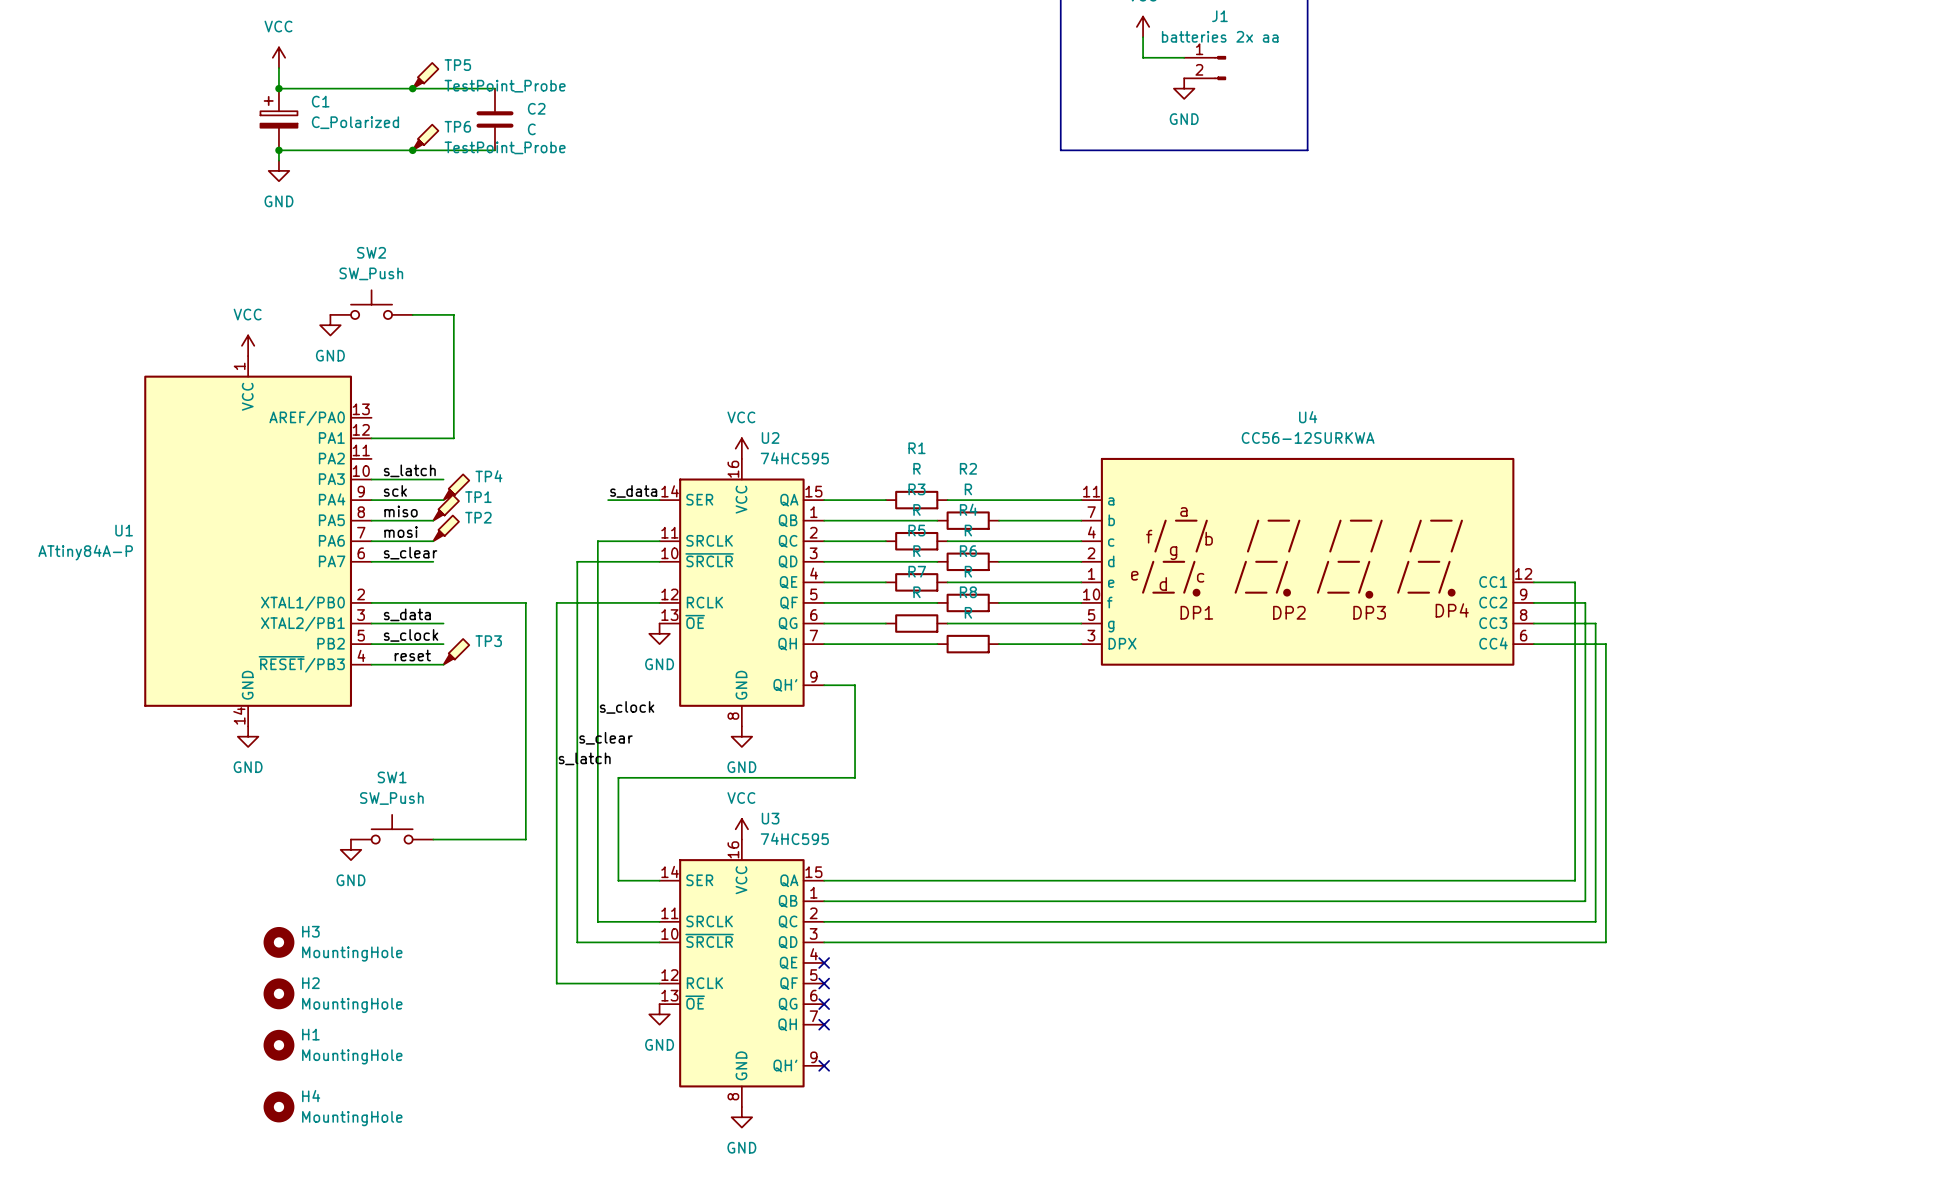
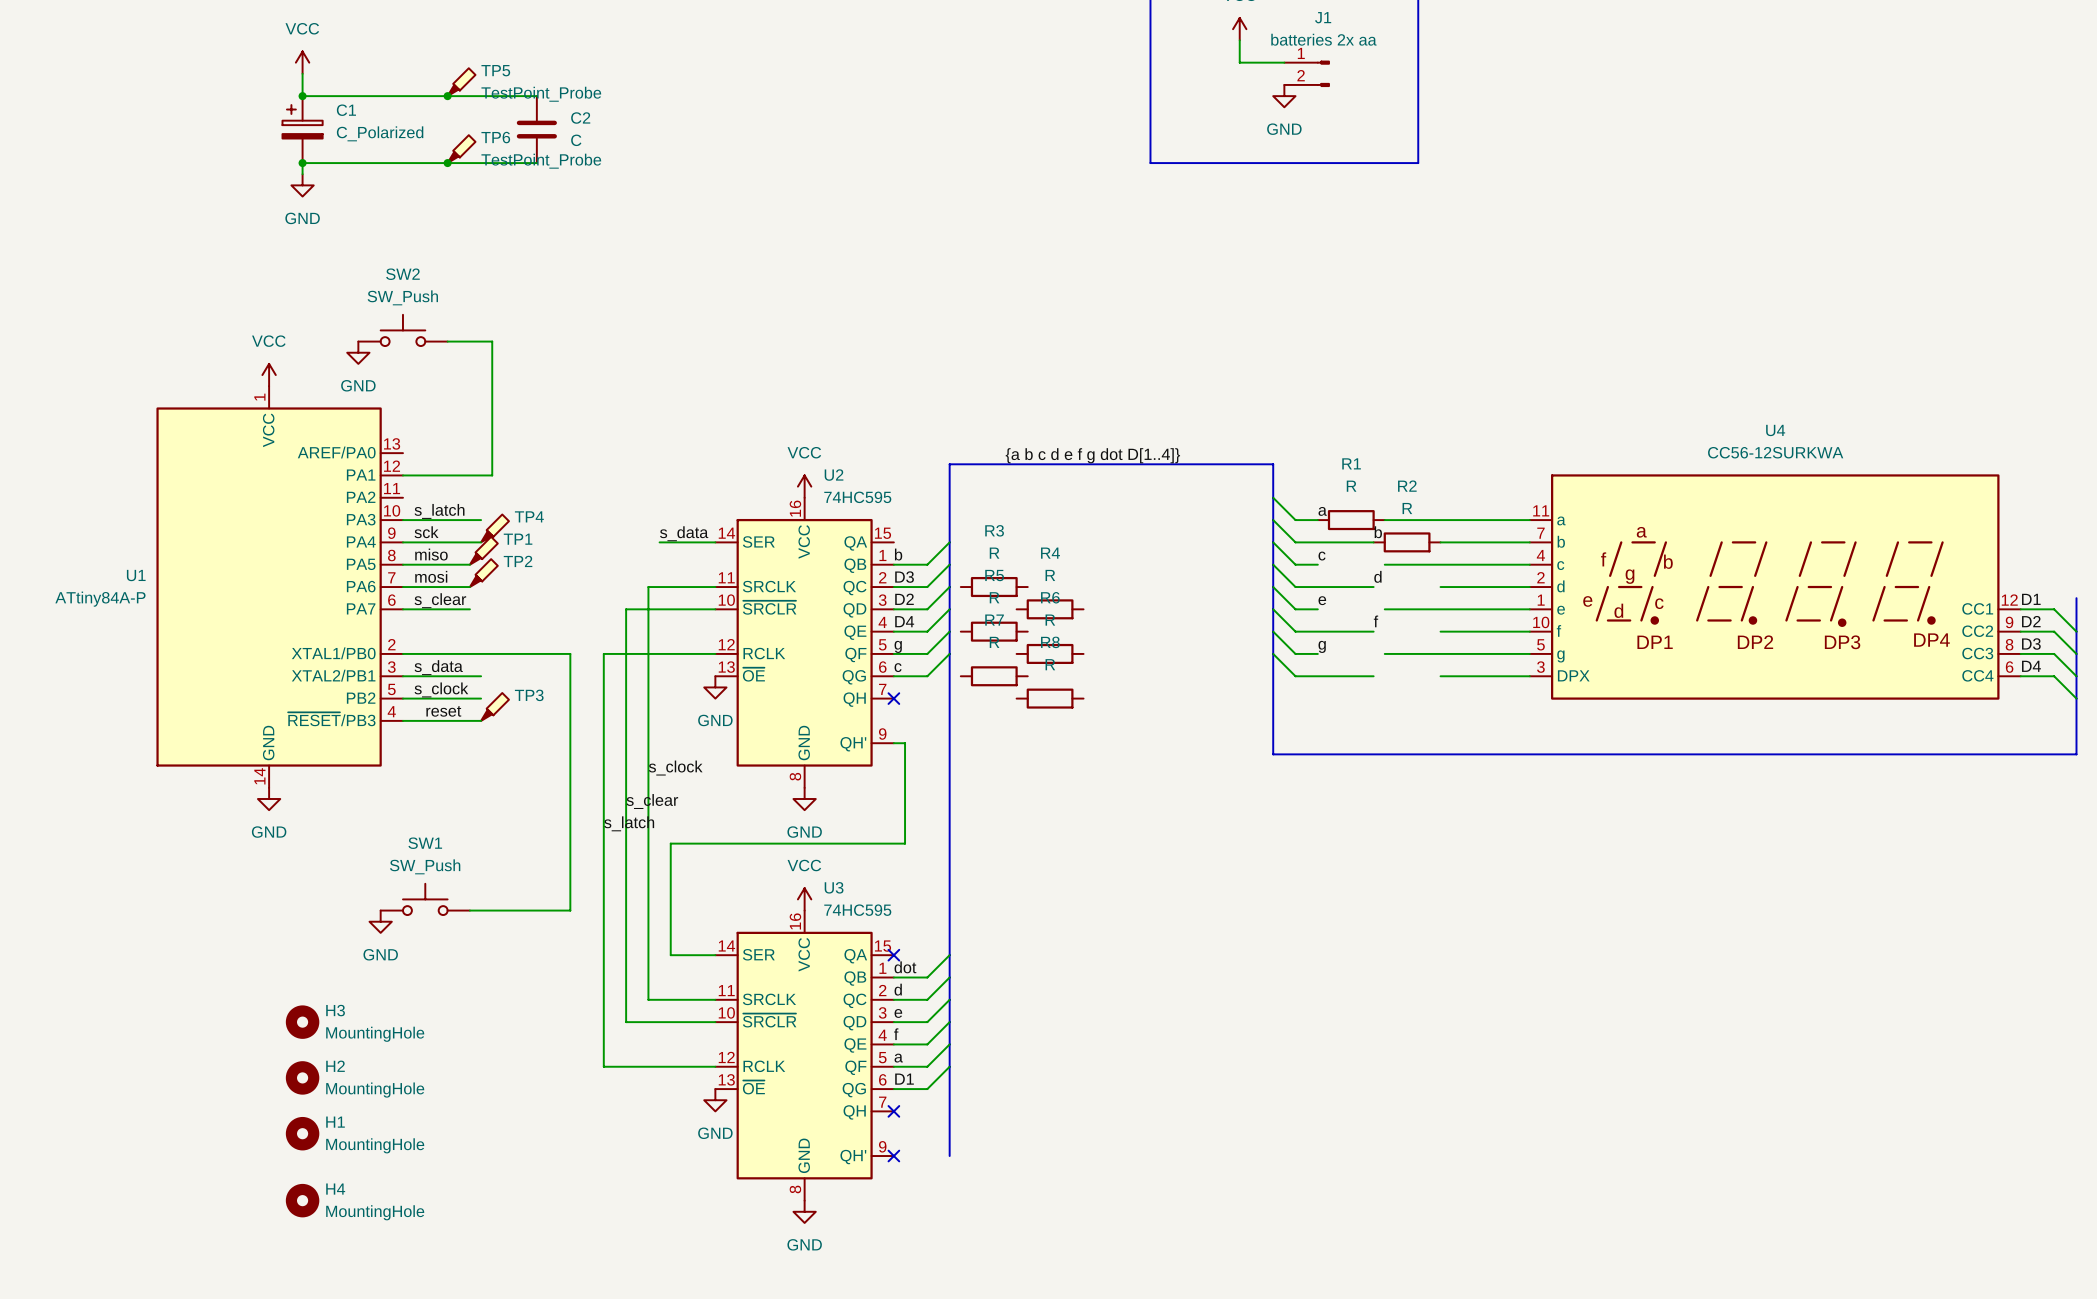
label: none -> {a b c d e f g dot D[1..4]} (1092, 455)
label: none -> a (1322, 511)
label: none -> b (1378, 532)
wire: (824, 500) (885, 500) -> none
R1 position: (916, 500) -> (1351, 520)
wire: (947, 500) (1081, 500) -> none
label: none -> b (898, 554)
label: none -> c (1322, 556)
wire: (855, 520) (937, 520) -> (927, 564) (949, 542)
R2 position: (968, 520) -> (1407, 542)
wire: (999, 520) (1081, 520) -> none
label: none -> D3 (904, 577)
label: none -> d (1377, 576)
wire: (855, 541) (885, 541) -> (927, 587) (949, 564)
wire: (947, 541) (1081, 541) -> none
bus: none -> (2076, 598) (2076, 754) (1273, 754) (1273, 464) (949, 464) (949, 1156)
label: none -> D2 (904, 599)
label: none -> D1 (2031, 599)
label: none -> e (1322, 600)
wire: (855, 561) (937, 561) -> (927, 609) (949, 587)
wire: (999, 561) (1081, 561) -> none
U4 position: (1307, 561) -> (1775, 587)
wire: none -> (2020, 609) (2054, 609) (2076, 631)
label: none -> D4 (904, 621)
label: none -> f (1376, 621)
label: none -> D2 (2031, 621)
wire: (855, 582) (885, 582) -> (927, 631) (949, 609)
wire: (947, 582) (1081, 582) -> none
wire: (1533, 582) (1575, 582) (1575, 880) (824, 880) -> none
wire: none -> (2020, 631) (2054, 631) (2076, 653)
label: none -> D3 (2031, 644)
label: none -> g (898, 646)
label: none -> g (1322, 646)
wire: (855, 602) (937, 602) -> (927, 653) (949, 631)
wire: (999, 602) (1081, 602) -> none
wire: (1533, 602) (1585, 602) (1585, 901) (855, 901) -> (949, 955) (927, 977)
wire: none -> (2020, 653) (2054, 653) (2076, 676)
label: none -> D4 (2031, 666)
label: none -> c (898, 667)
wire: (855, 623) (885, 623) -> (927, 676) (949, 653)
wire: (947, 623) (1081, 623) -> none
wire: (1533, 623) (1595, 623) (1595, 921) (855, 921) -> (949, 977) (927, 999)
wire: none -> (2020, 676) (2054, 676) (2076, 698)
wire: (824, 644) (937, 644) -> none
no-connect mark: none -> (893, 698)
wire: (999, 644) (1081, 644) -> none
wire: (1533, 644) (1605, 644) (1605, 942) (855, 942) -> (949, 999) (927, 1022)
wire: (834, 685) (855, 685) (855, 777) (834, 777) -> (905, 743) (905, 843)
no-connect mark: none -> (893, 955)
label: none -> dot (905, 967)
label: none -> d (898, 989)
label: none -> e (898, 1013)
wire: none -> (949, 1022) (927, 1044) (893, 1044)
label: none -> f (896, 1034)
no-connect mark: (824, 962) -> none
wire: none -> (949, 1044) (927, 1066) (893, 1066)
label: none -> a (898, 1058)
no-connect mark: (824, 983) -> none
wire: none -> (949, 1066) (927, 1089) (893, 1089)
label: none -> D1 (904, 1079)
no-connect mark: (824, 1004) -> none

